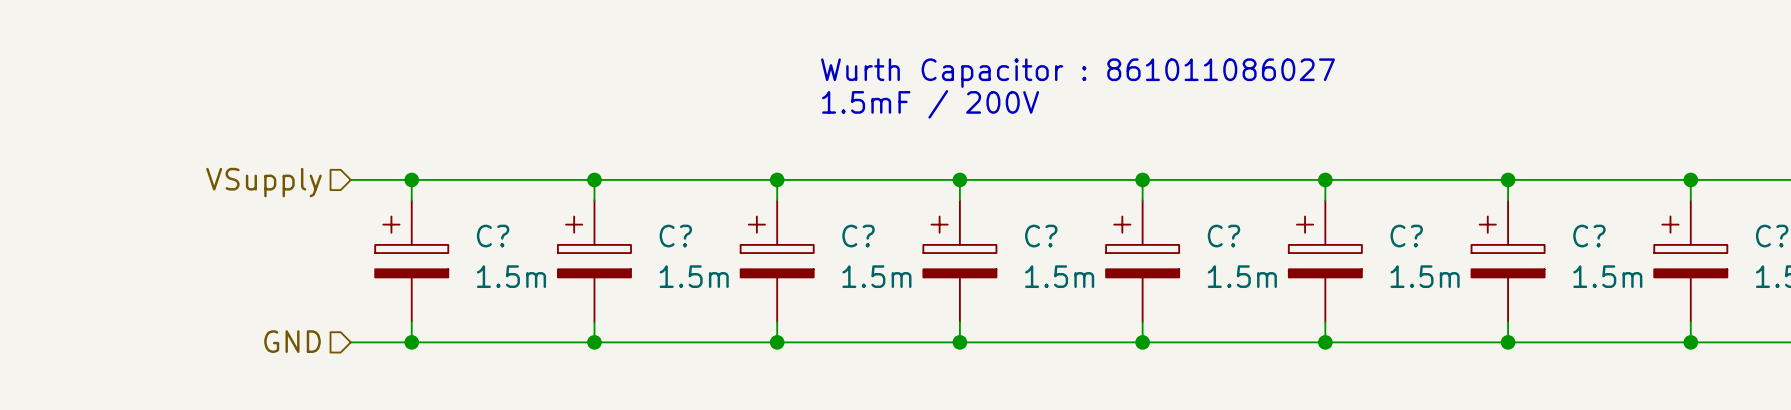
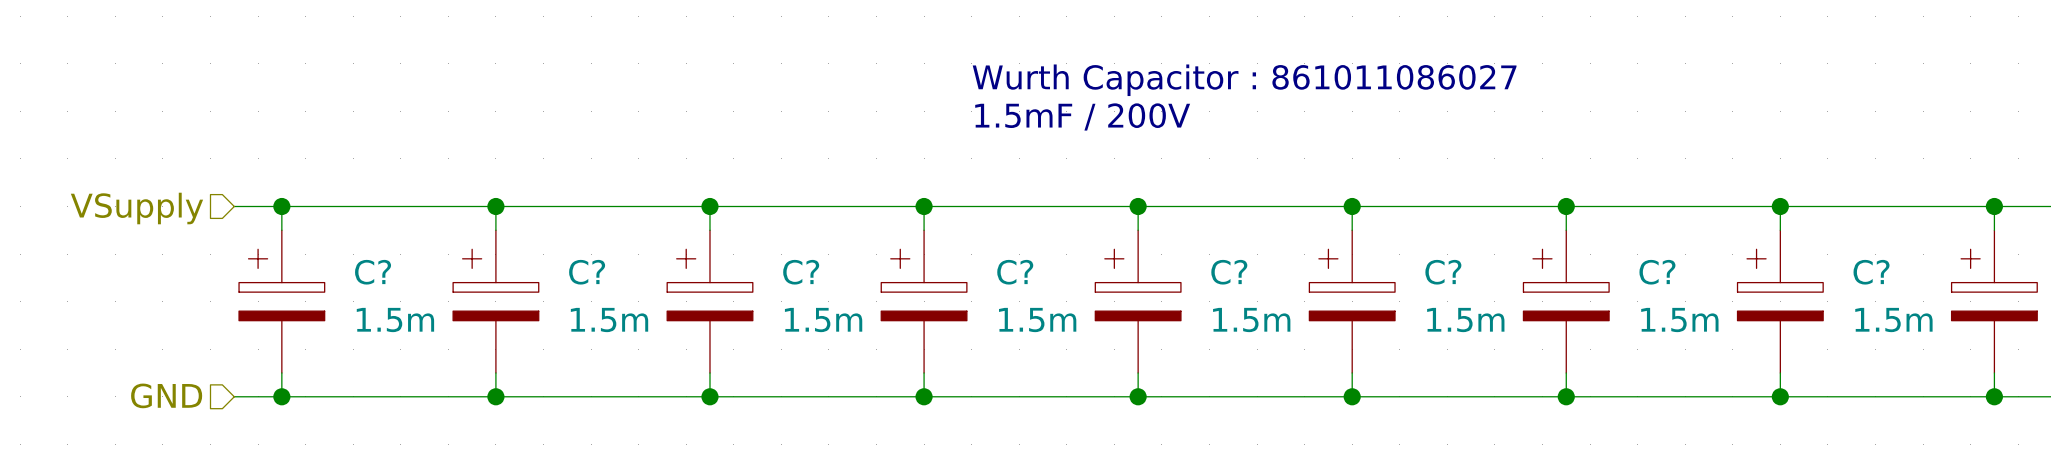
wire: none -> (234, 206) (424, 206)
wire: none -> (281, 206) (281, 230)
junction: none -> (281, 206)
hierarchical label position: VSupply (263, 182) -> VSupply (136, 208)
C?: none -> 1.5m (281, 301)
wire: none -> (281, 372) (281, 396)
hierarchical label position: GND (292, 341) -> GND (166, 395)
wire: none -> (234, 396) (424, 396)
junction: none -> (281, 396)

